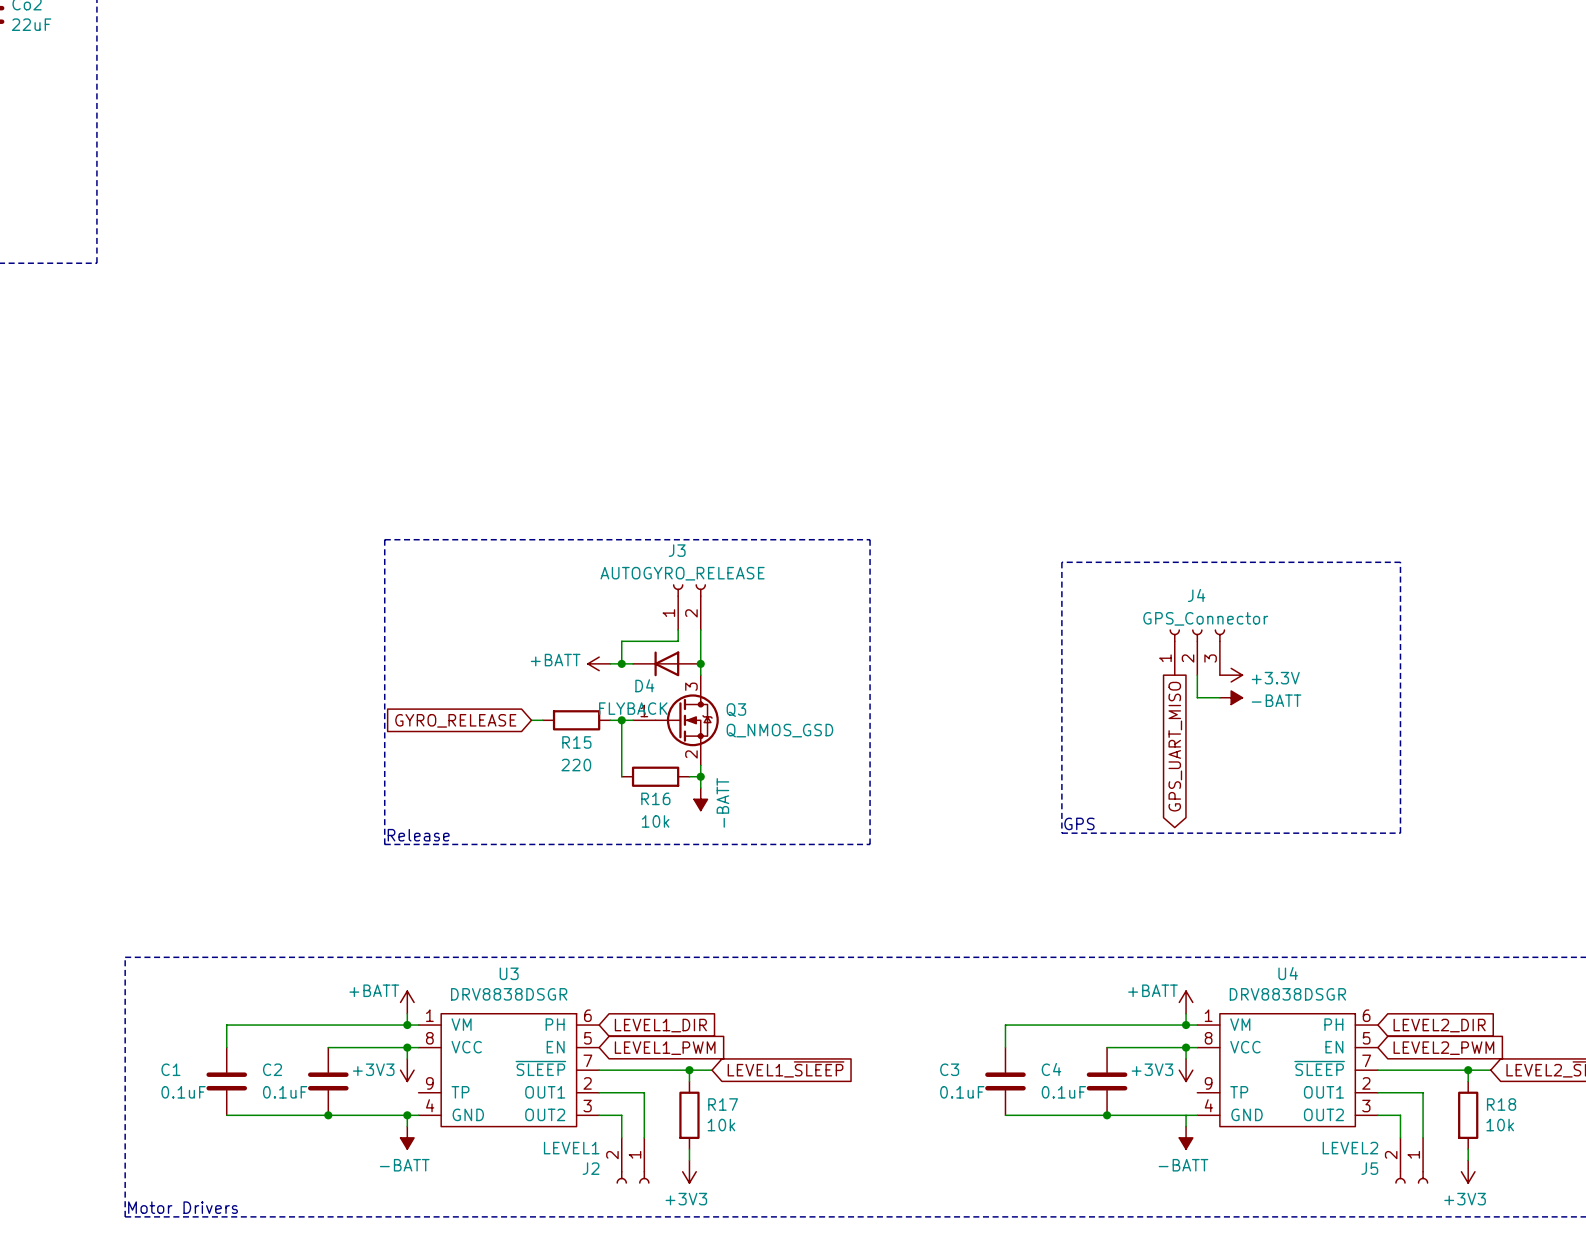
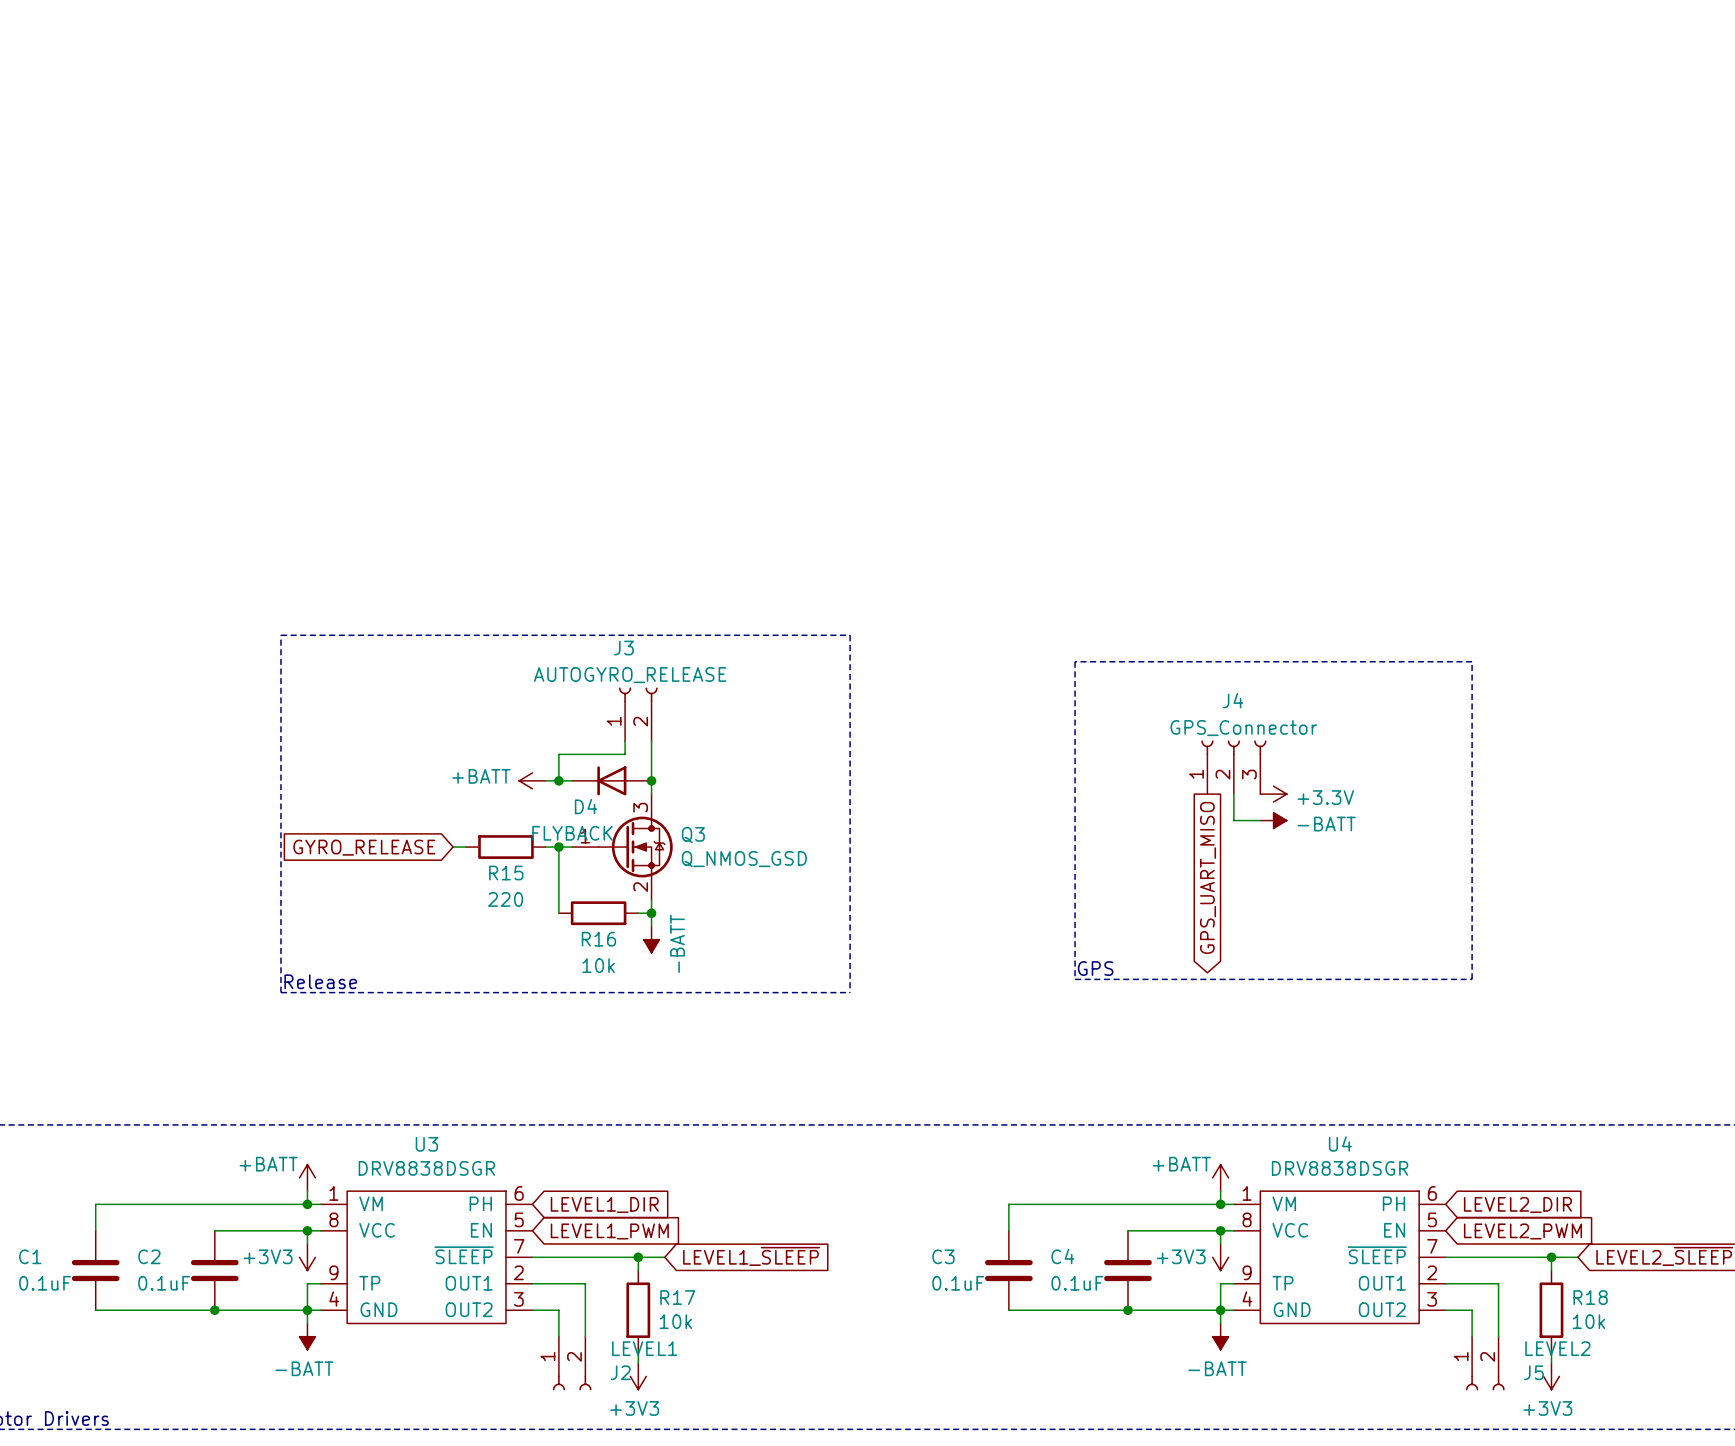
wire: none -> (320, 1283) (307, 1283) (307, 1310)
wire: none -> (1233, 1283) (1220, 1283) (1220, 1310)
junction: none -> (1220, 1310)
J2 flip: as is (633, 1177) -> left-right (572, 1383)
J5 flip: as is (1411, 1177) -> left-right (1485, 1383)

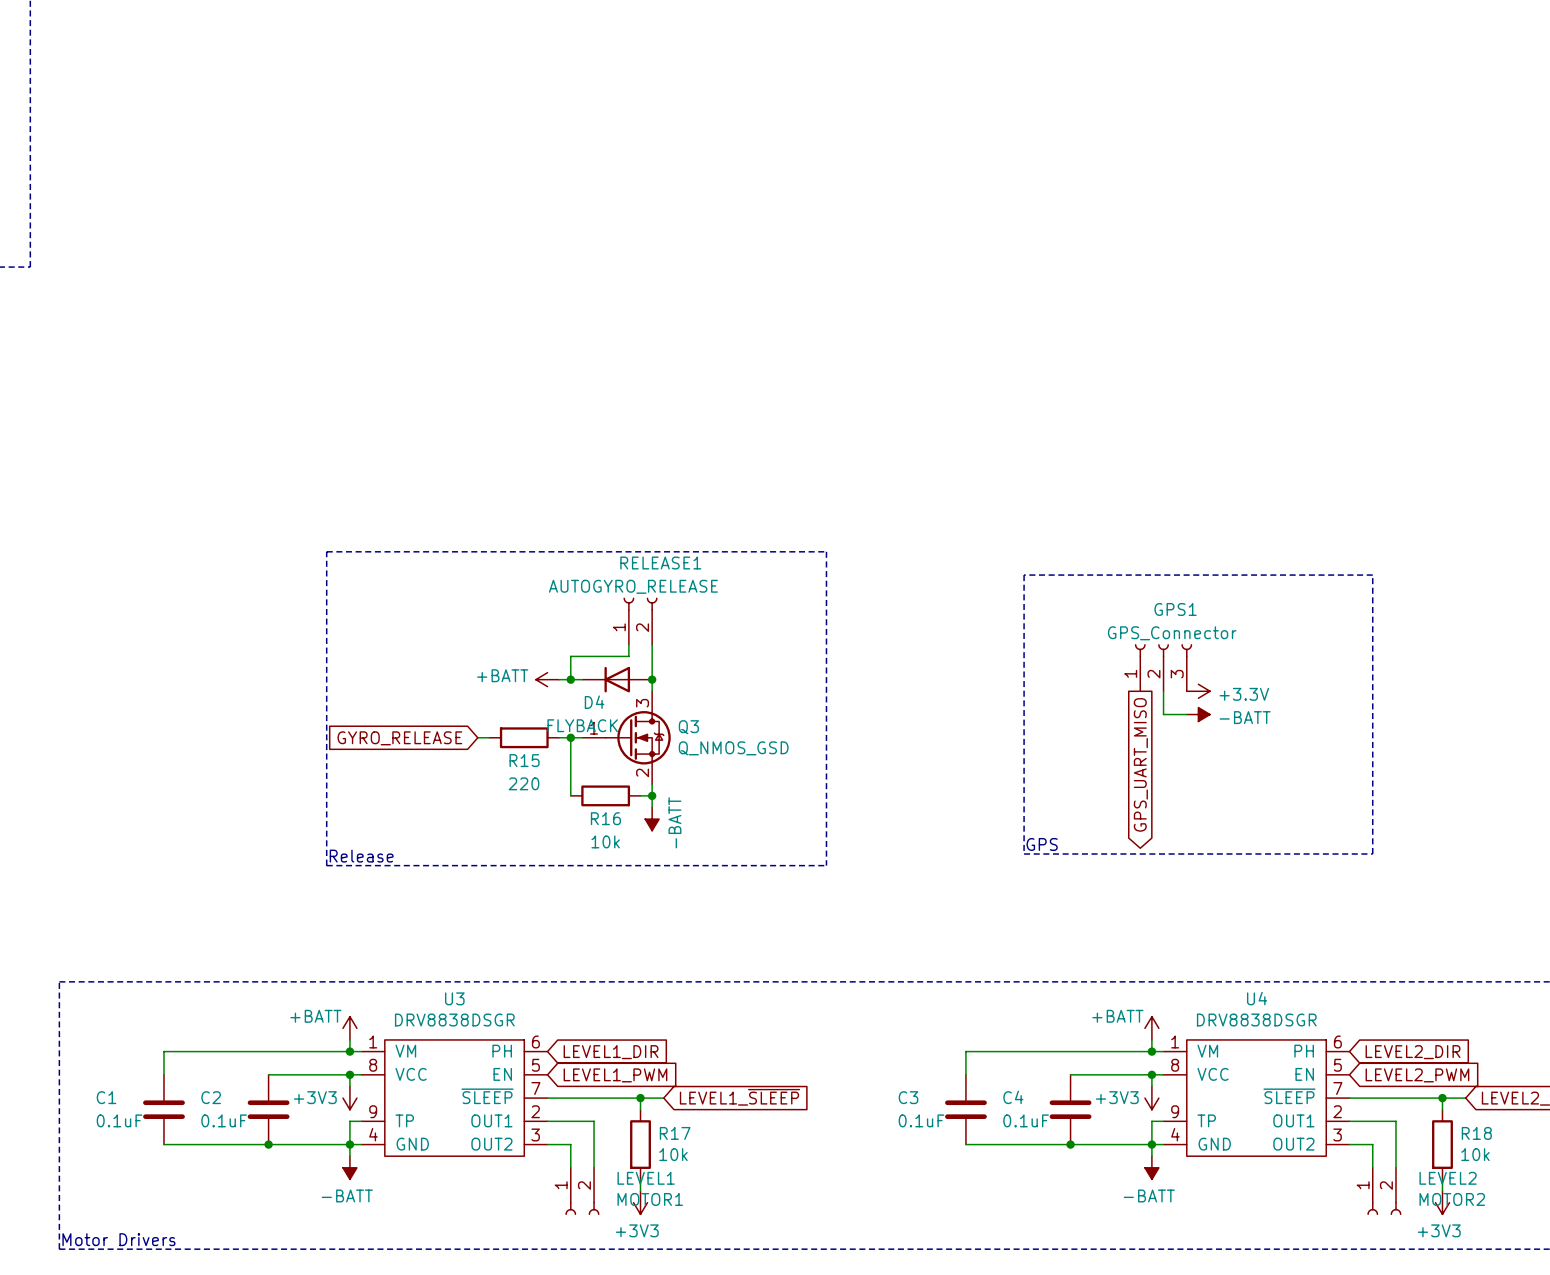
J3 name: J3 (623, 648) -> RELEASE1 (660, 563)
J4 name: J4 (1233, 700) -> GPS1 (1175, 609)
J2 name: J2 (620, 1372) -> MOTOR1 (650, 1199)
J5 name: J5 (1533, 1372) -> MOTOR2 (1452, 1199)

